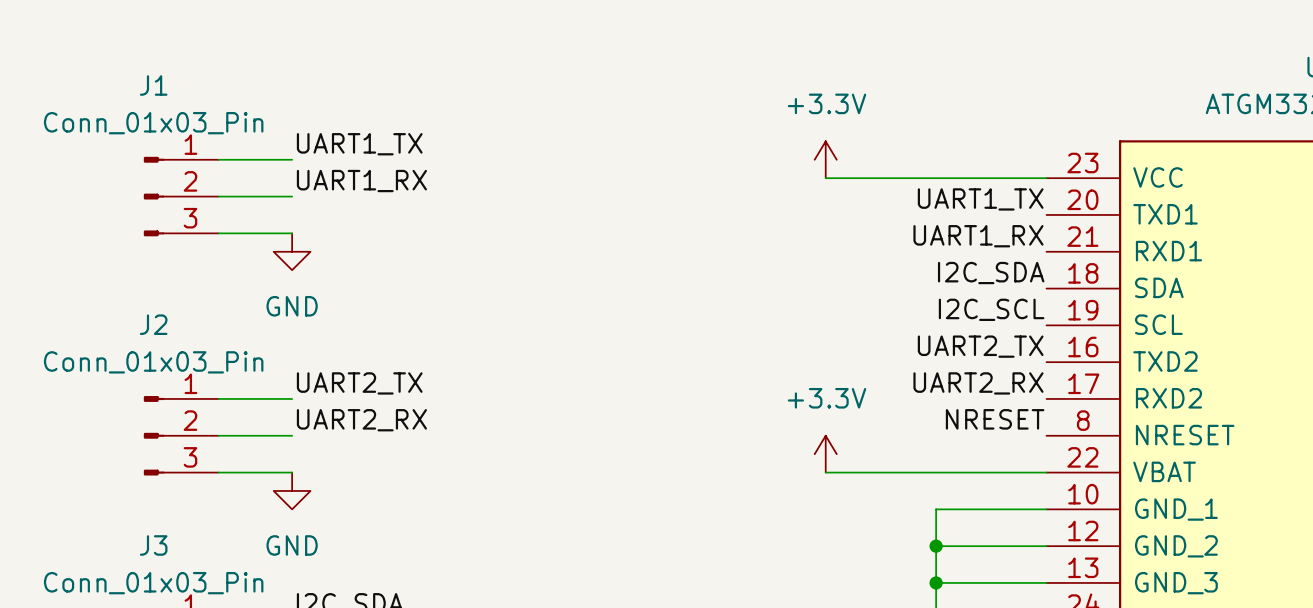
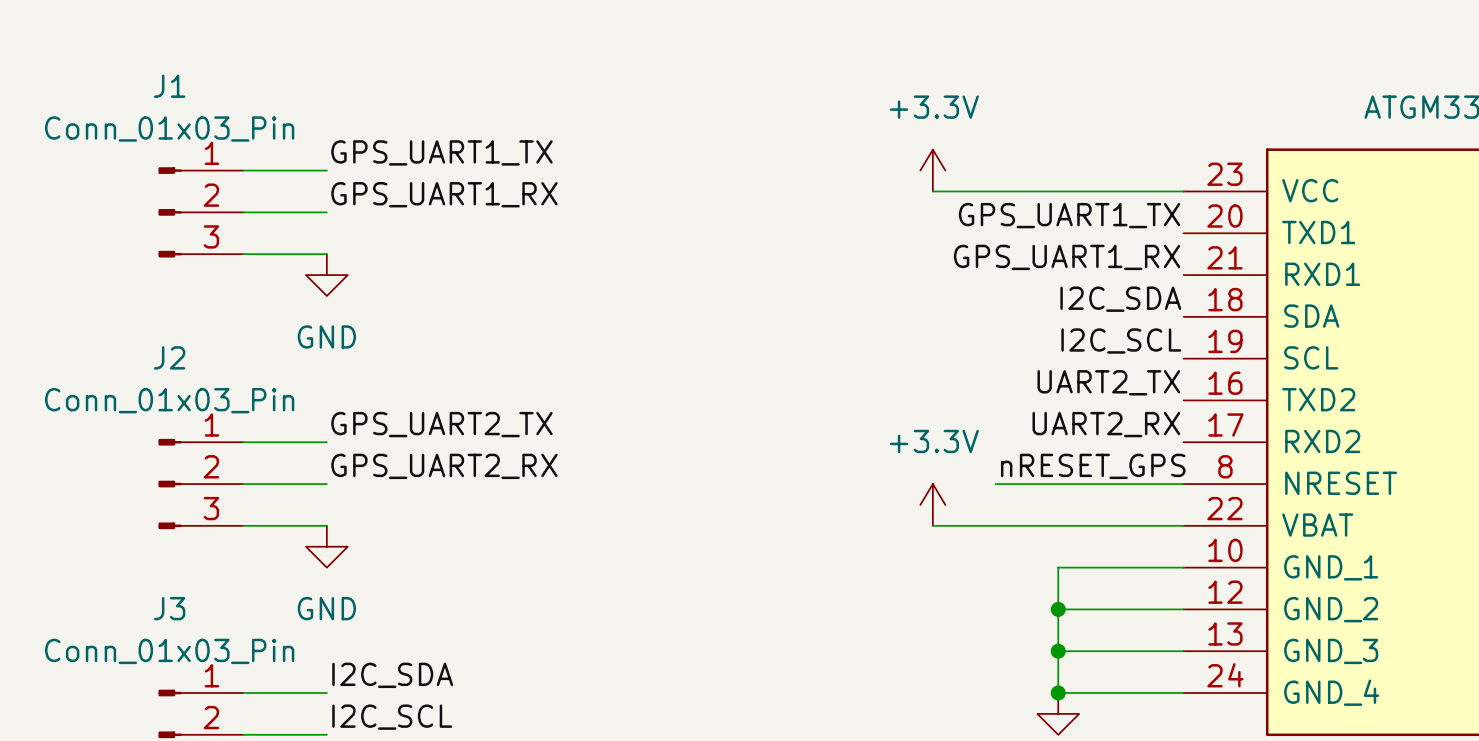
label: UART1_TX (359, 144) -> GPS_UART1_TX (441, 152)
label: UART1_RX (361, 181) -> GPS_UART1_RX (444, 194)
label: UART1_TX (980, 199) -> GPS_UART1_TX (1069, 215)
label: UART1_RX (978, 236) -> GPS_UART1_RX (1067, 257)
label: UART2_TX (359, 383) -> GPS_UART2_TX (441, 424)
label: NRESET (995, 419) -> nRESET_GPS (1093, 466)
label: UART2_RX (361, 420) -> GPS_UART2_RX (444, 466)
wire: none -> (995, 484) (1183, 484)

